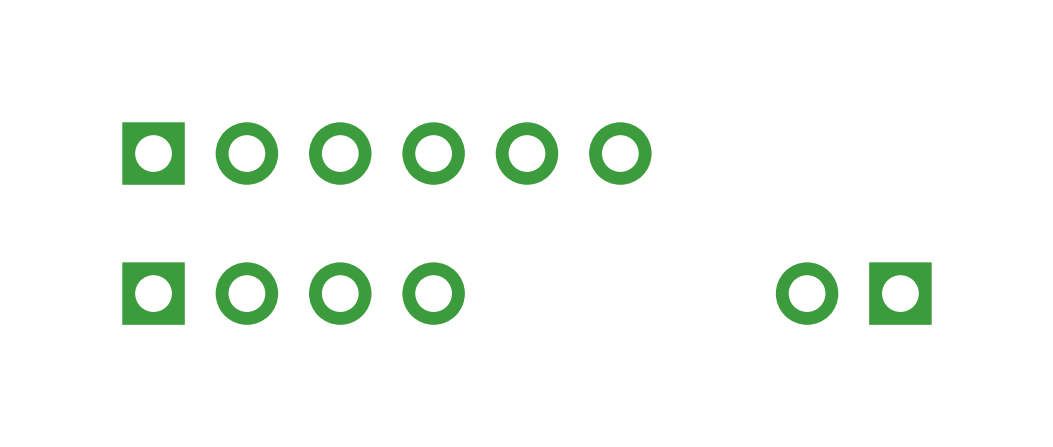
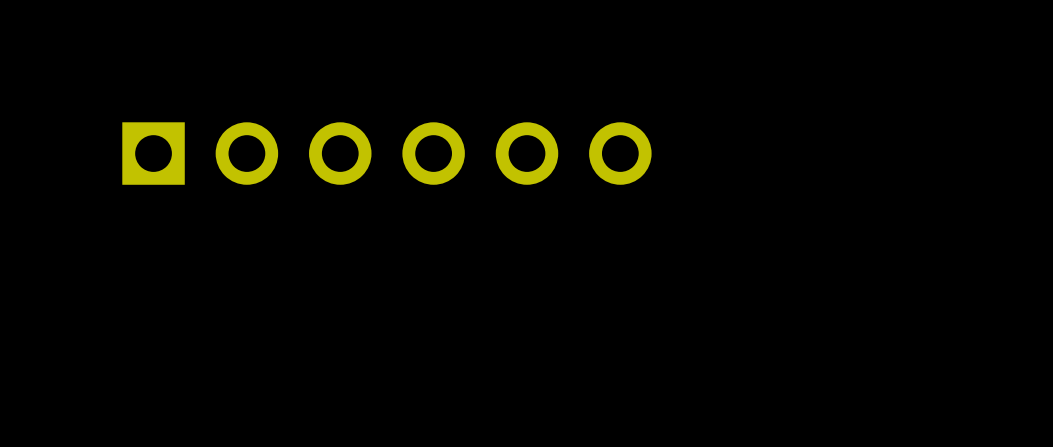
part: (293, 293) -> none
part: (853, 293) -> none

